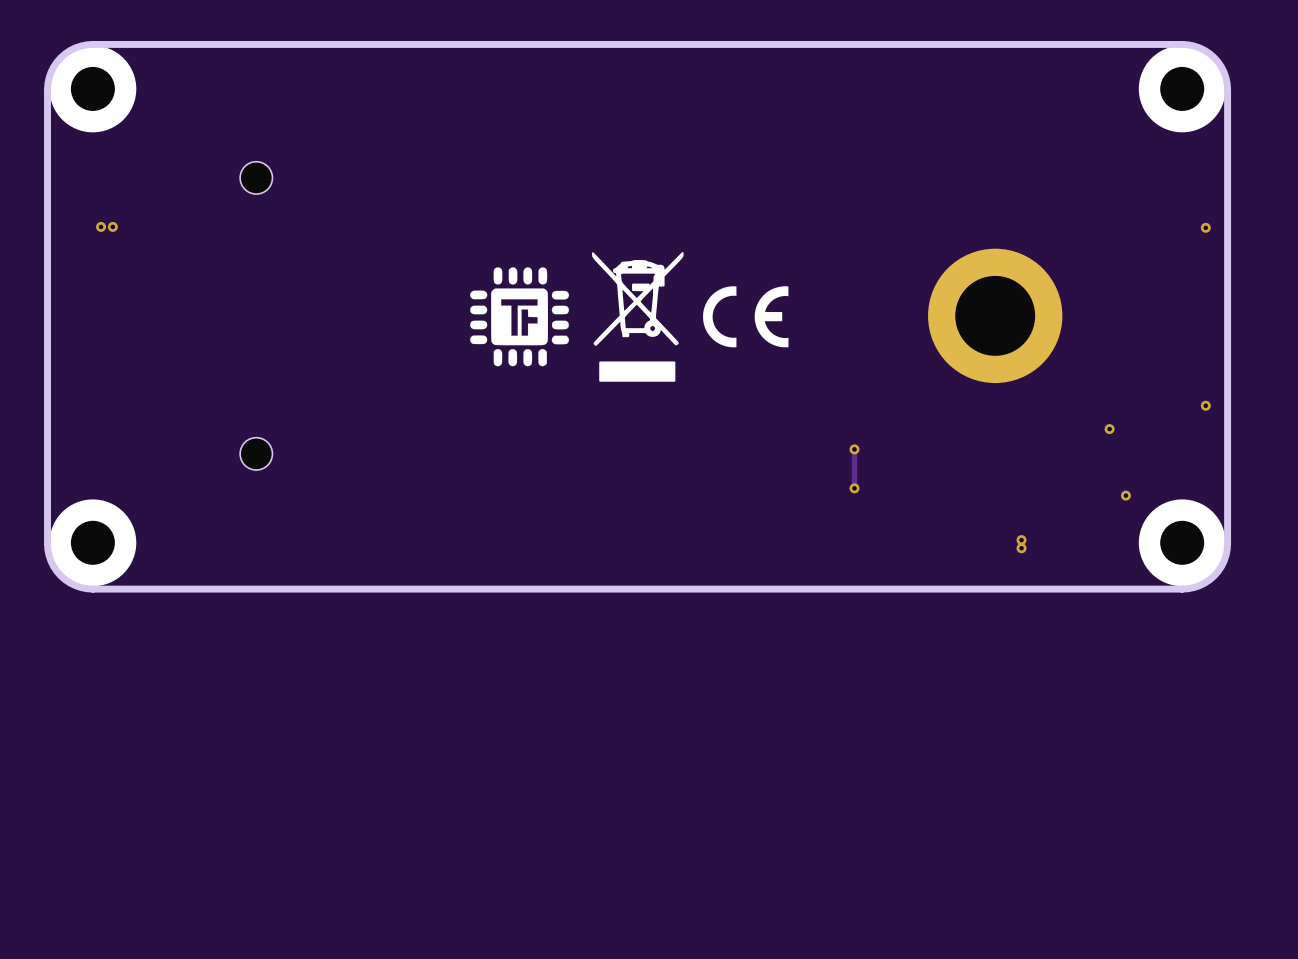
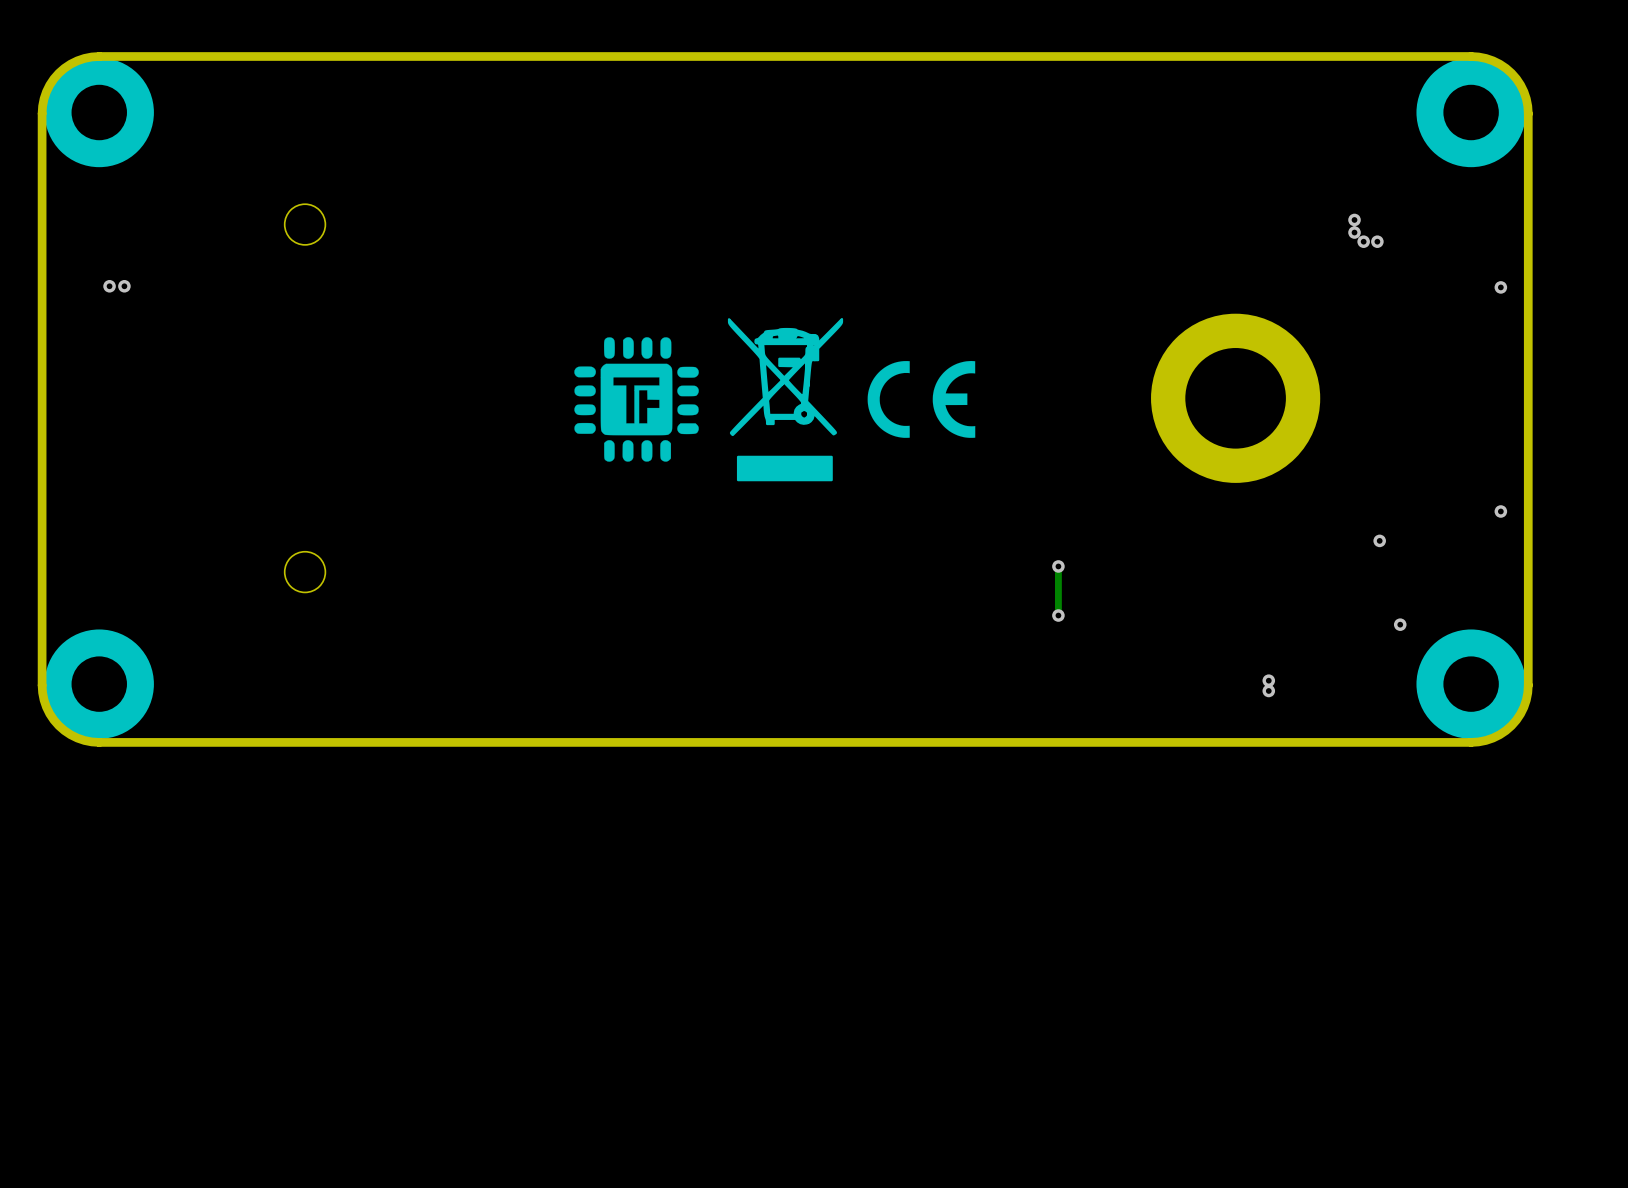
via: none -> (1354, 219)
via: none -> (1354, 232)
via: none -> (1363, 241)
via: none -> (1377, 241)

